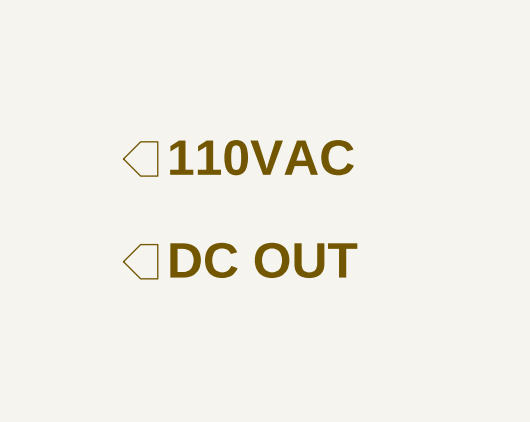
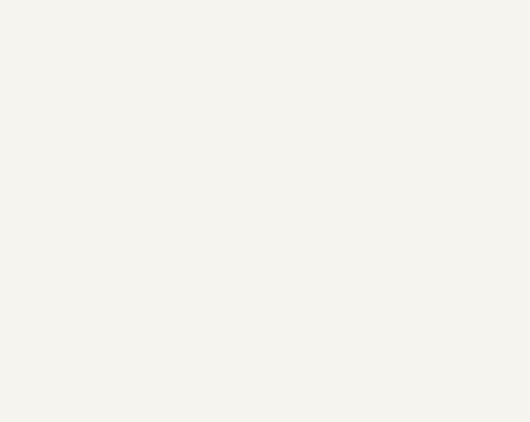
hierarchical label: 110VAC (261, 157) -> none
hierarchical label: DC OUT (263, 260) -> none

